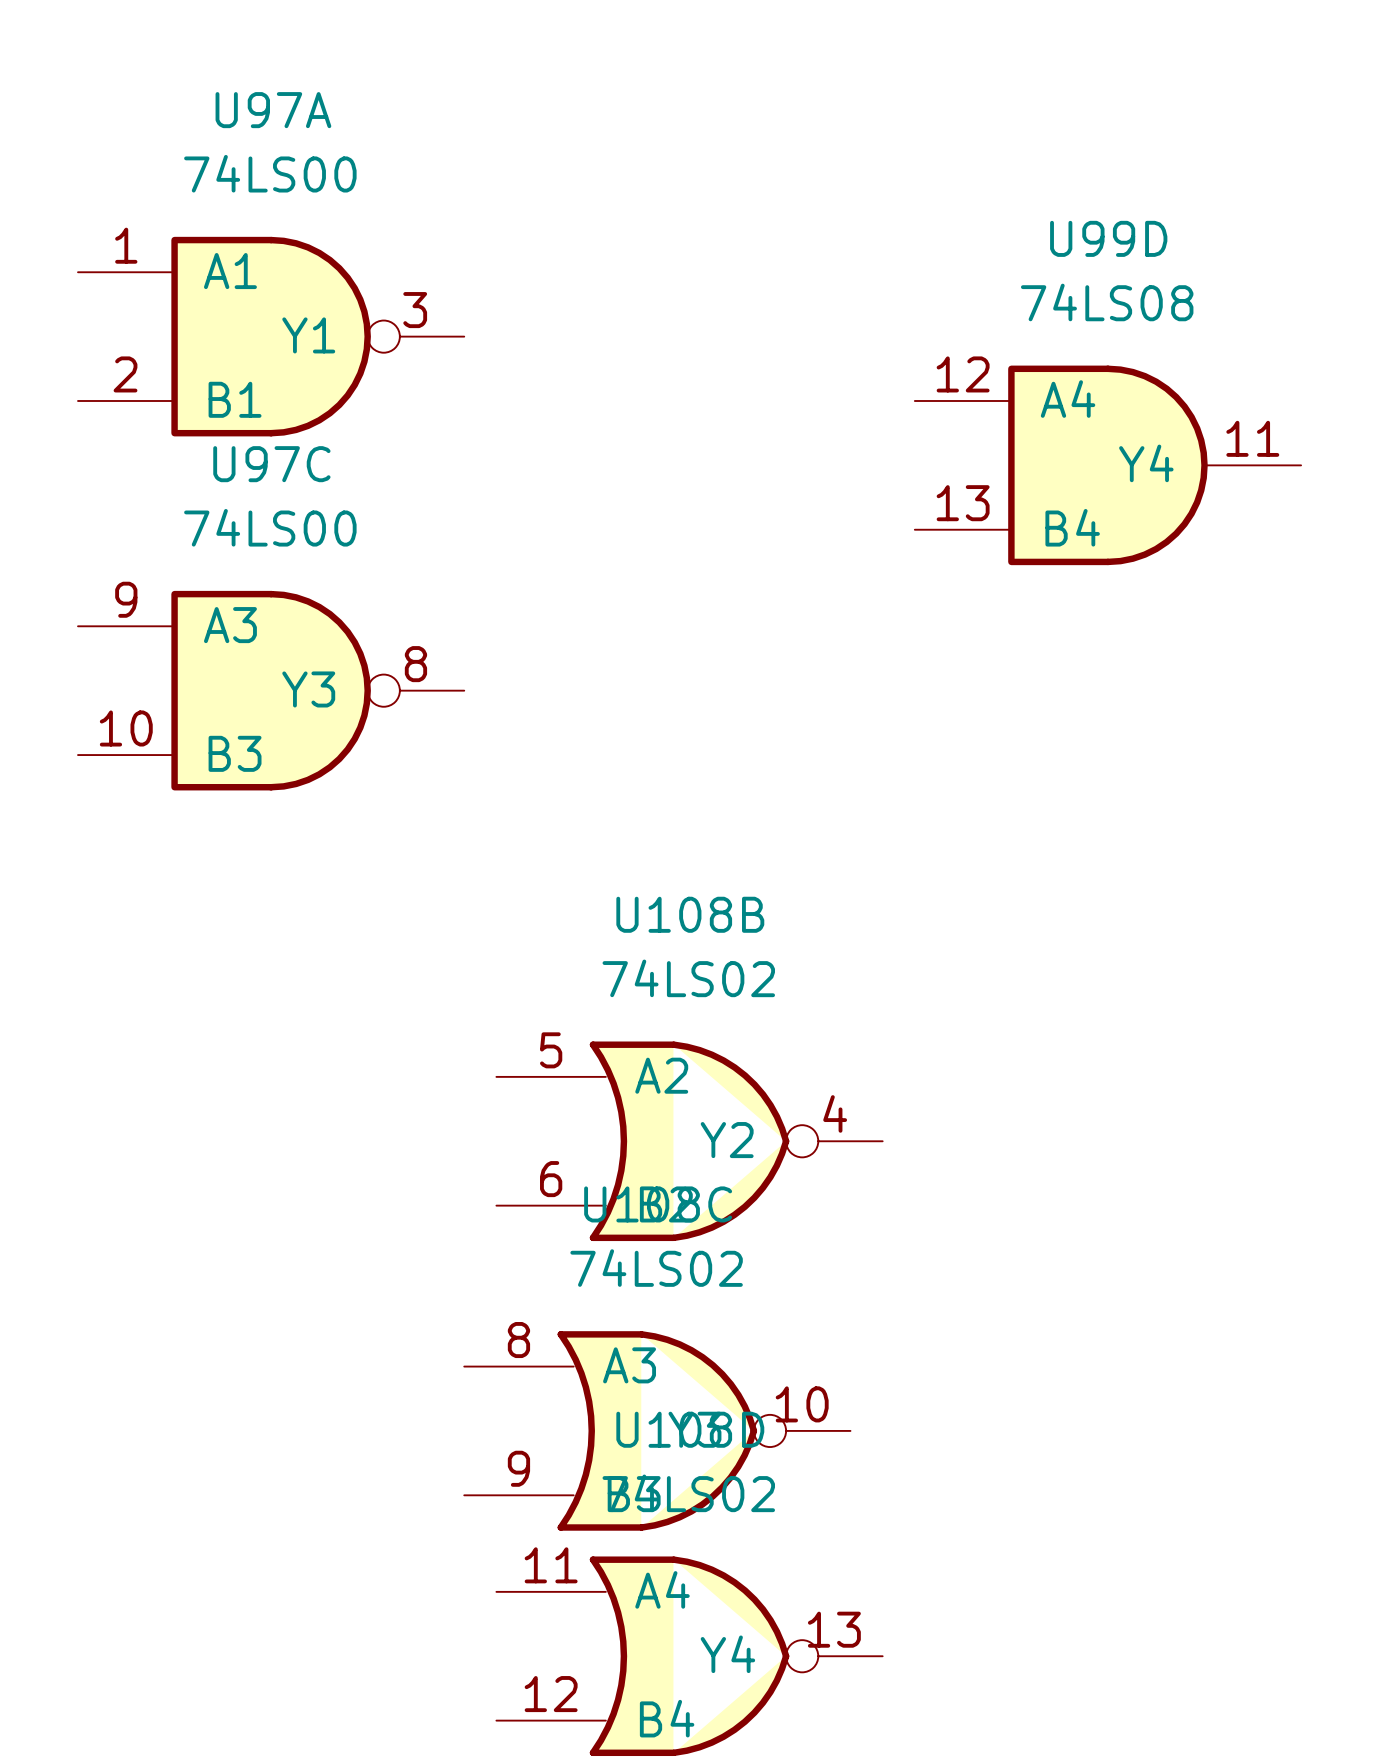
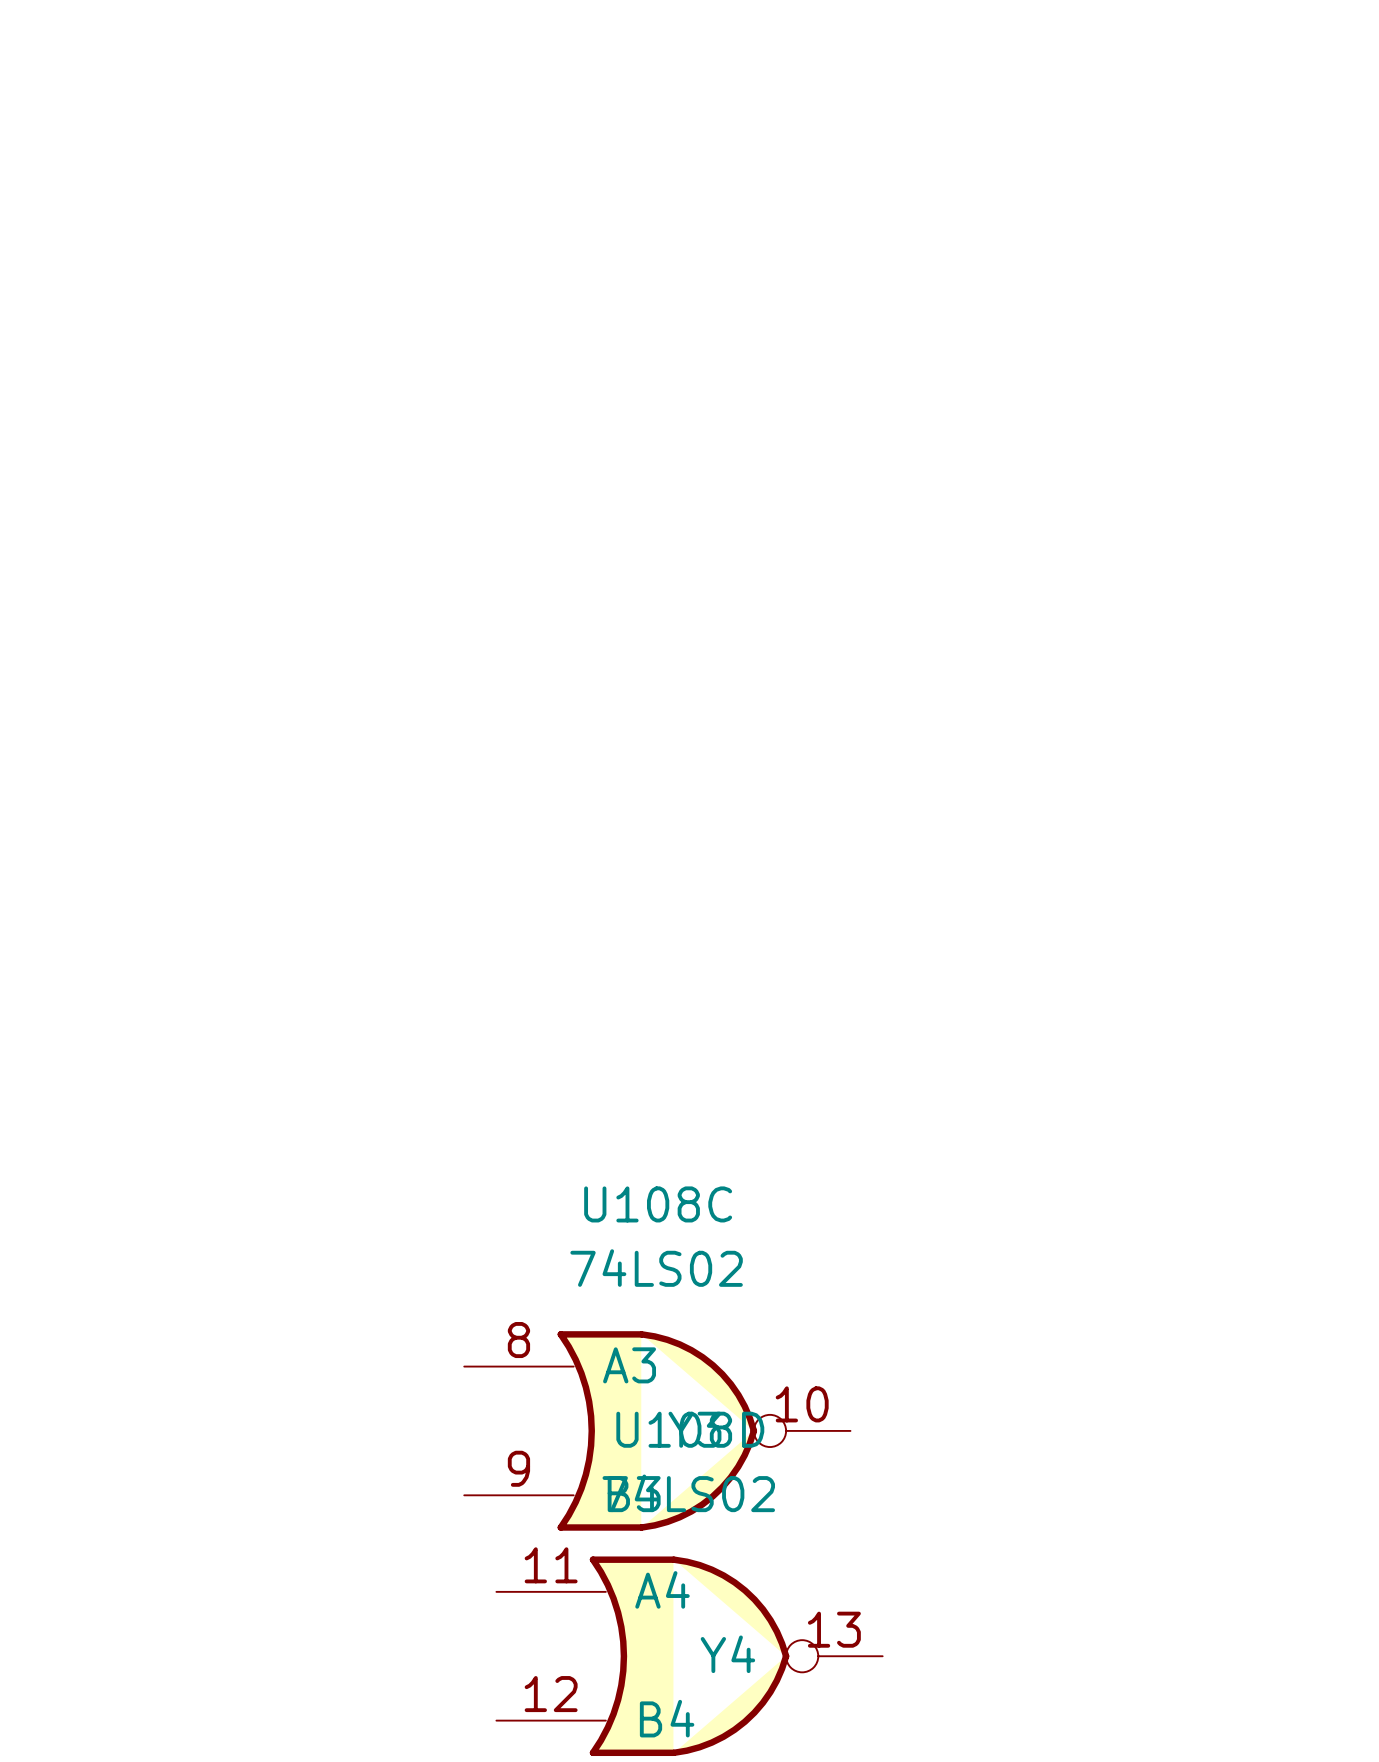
U97A: 74LS00 (271, 336) -> none
U99D: 74LS08 (1107, 465) -> none
U97C: 74LS00 (271, 690) -> none
U108B: 74LS02 (689, 1141) -> none

